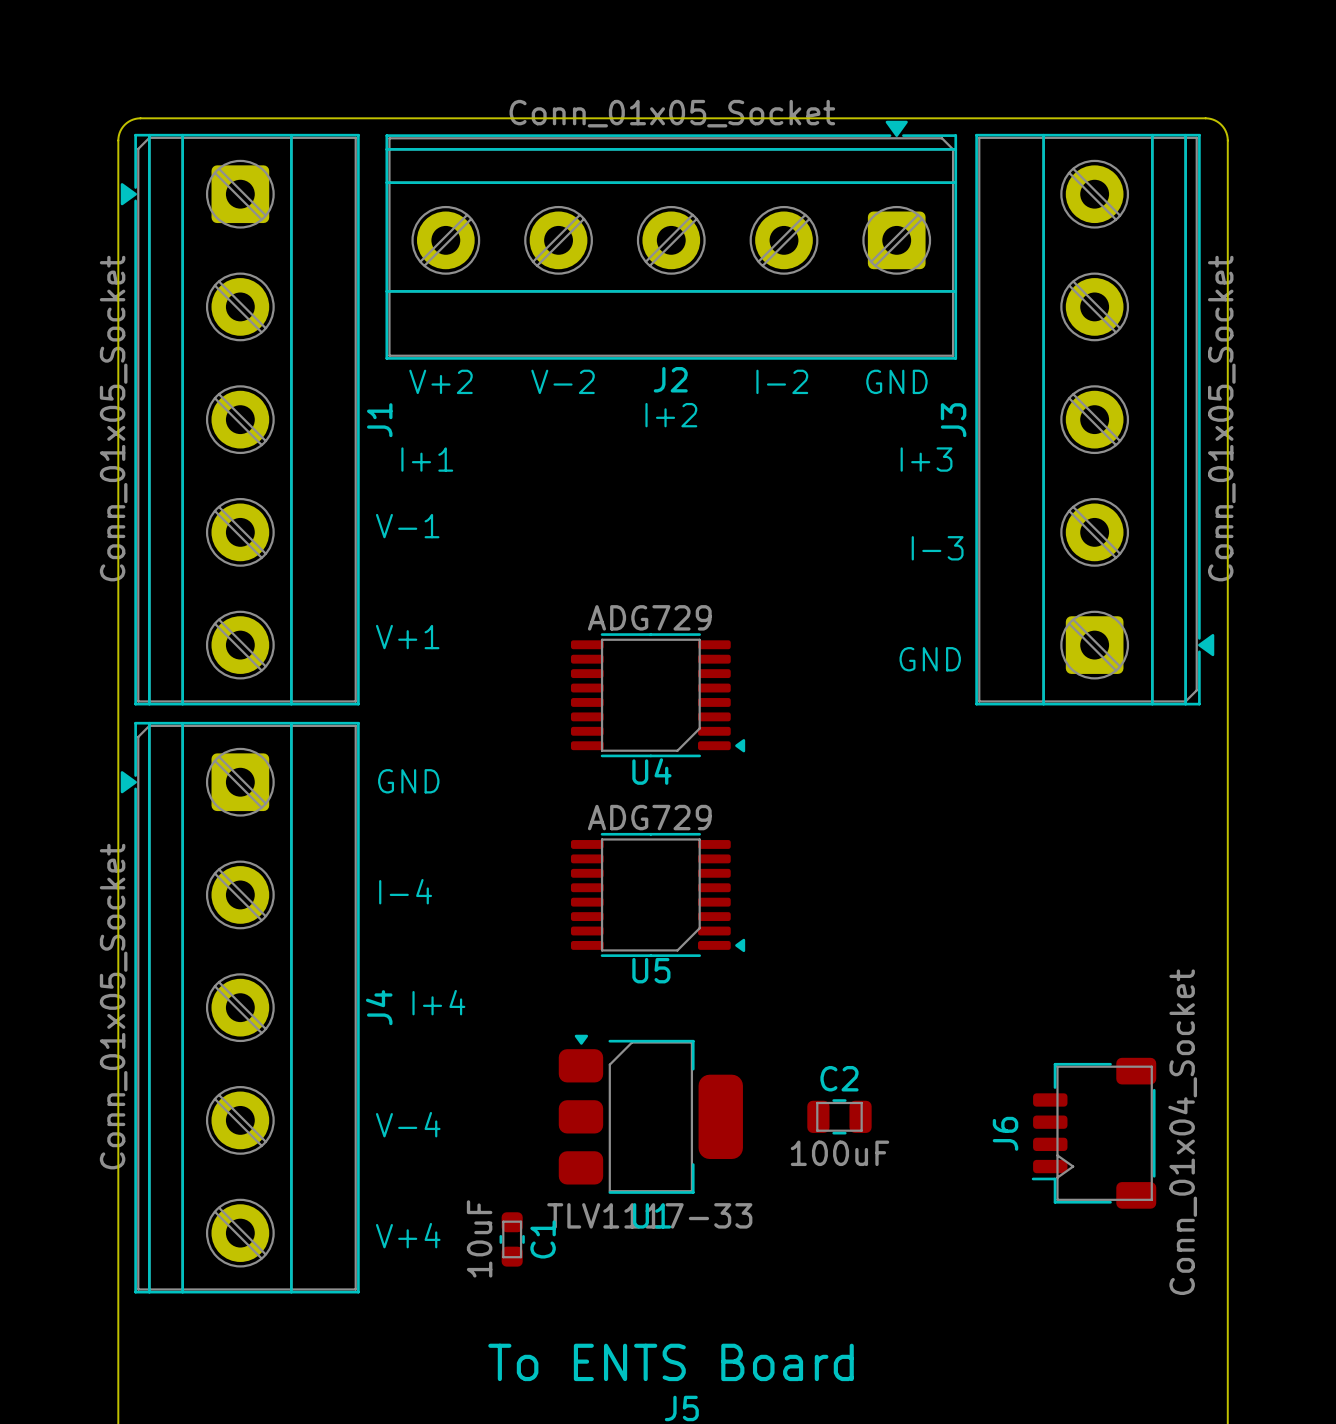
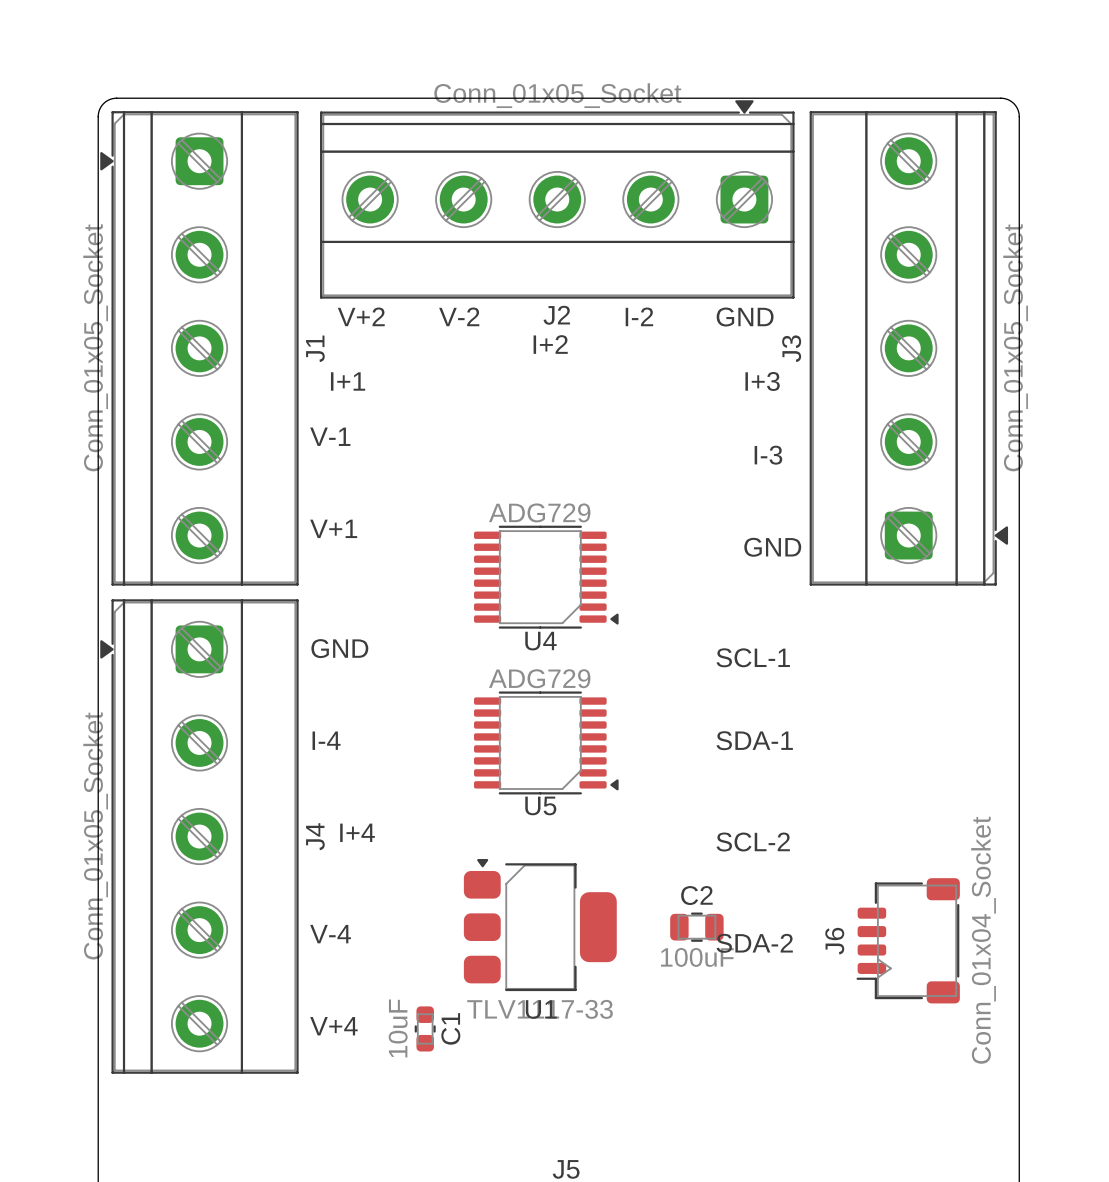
text: none -> SCL-1 (753, 657)
text: none -> SDA-1 (754, 740)
text: none -> SCL-2 (753, 842)
text: none -> SDA-2 (754, 943)
text: To ENTS Board (671, 1362) -> none

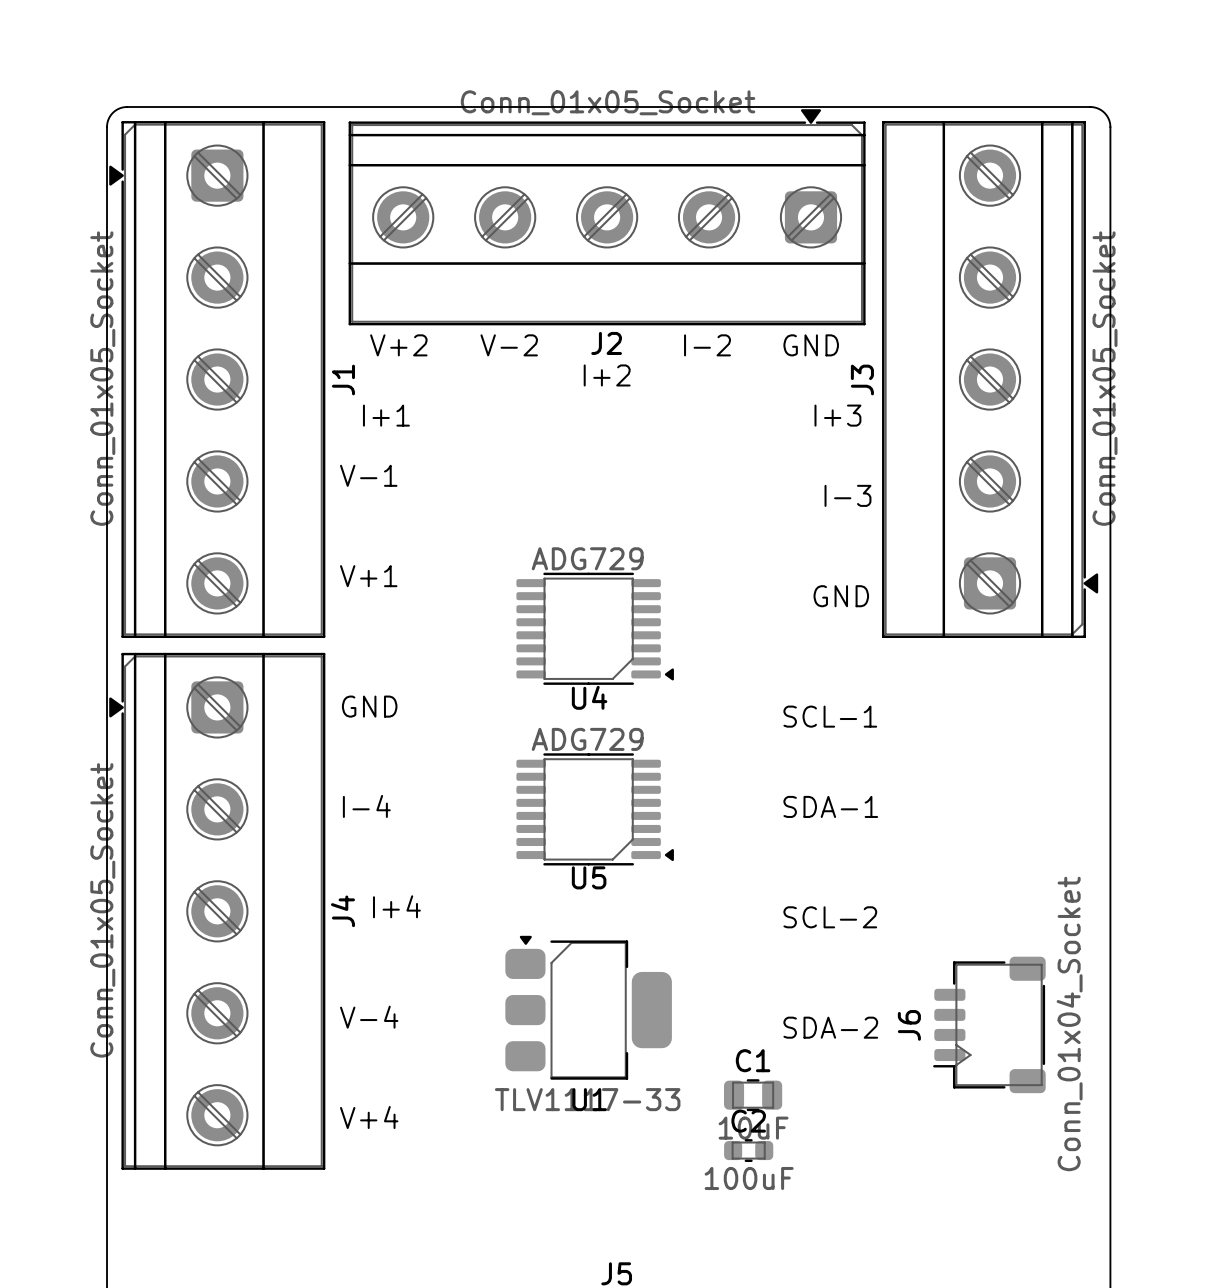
C2 footprint: [670, 912, 724, 942] -> [724, 1139, 774, 1162]
C1 footprint: [414, 1006, 436, 1052] -> [724, 1079, 783, 1112]
C1 value position: 10uF (398, 1028) -> 10uF (753, 1128)
C1 name position: C1 (450, 1028) -> C1 (753, 1060)

